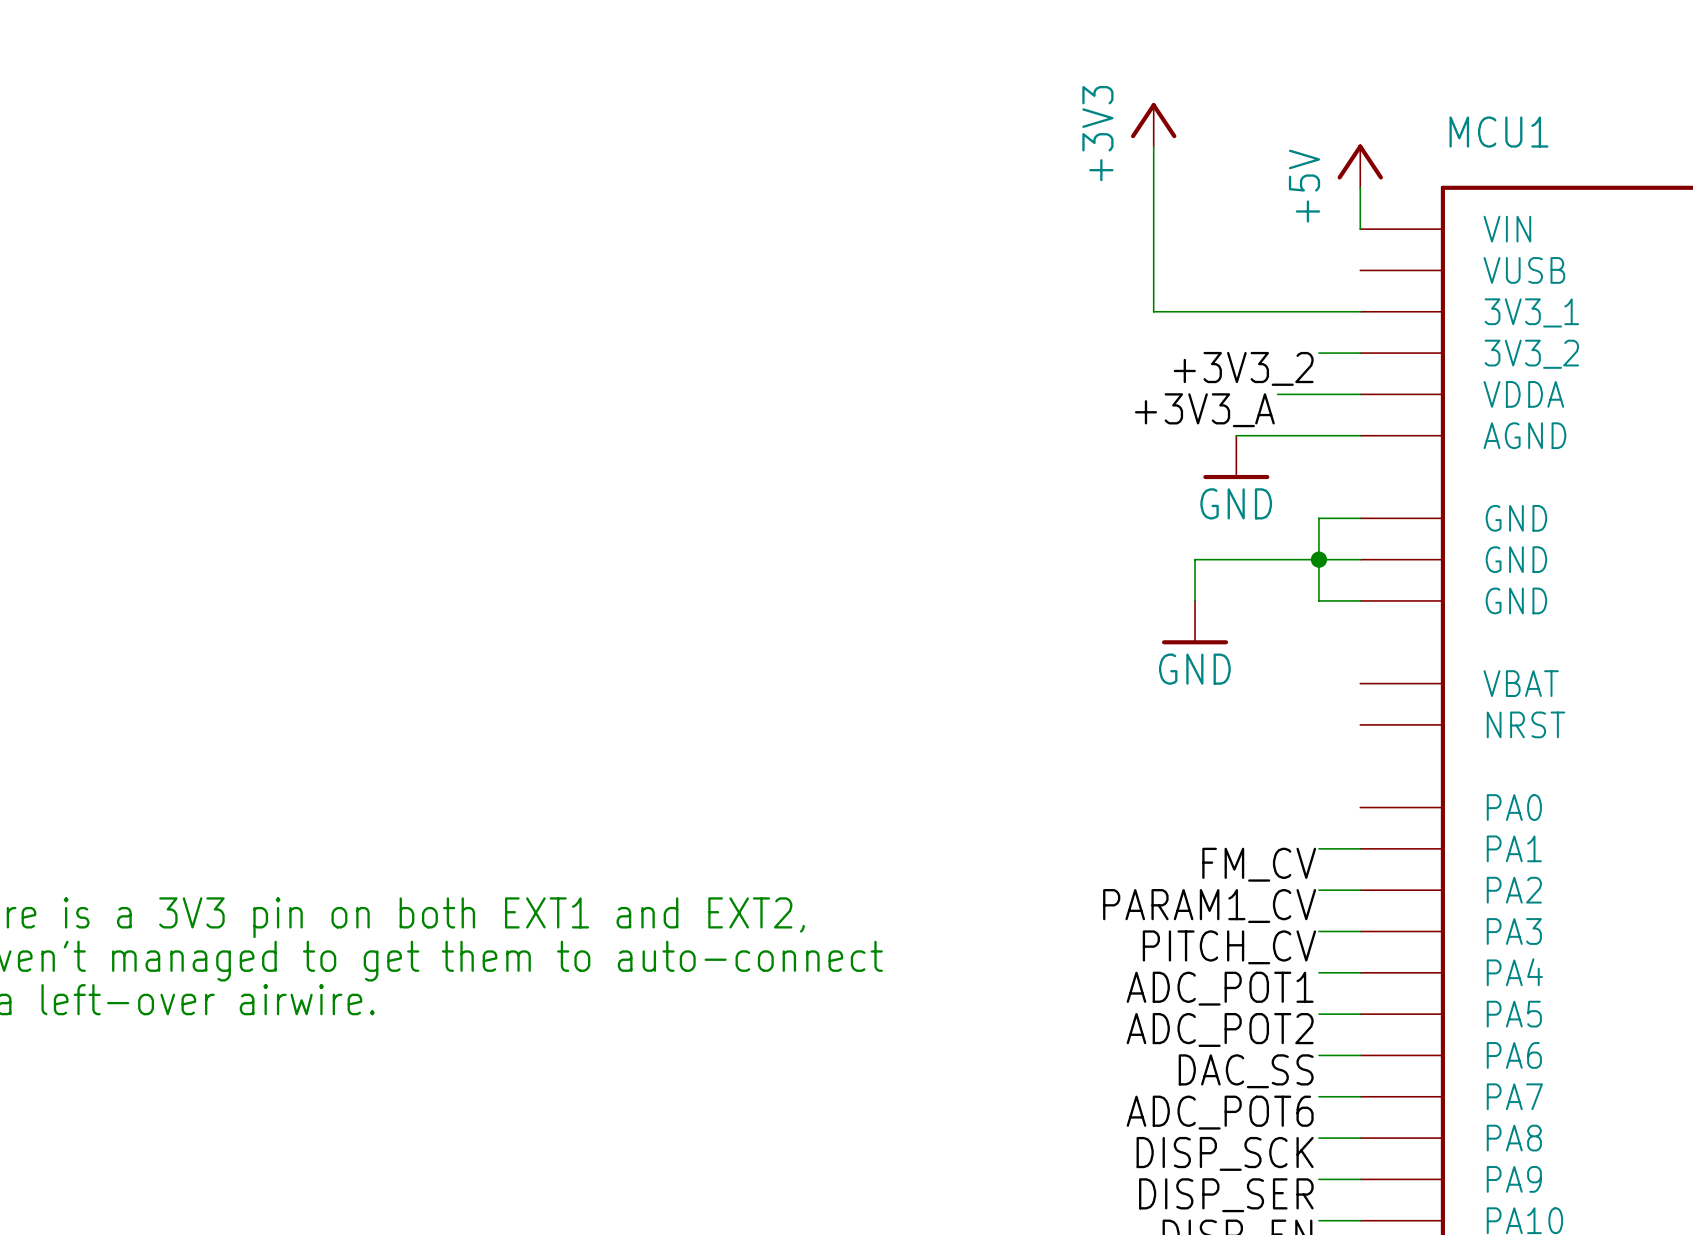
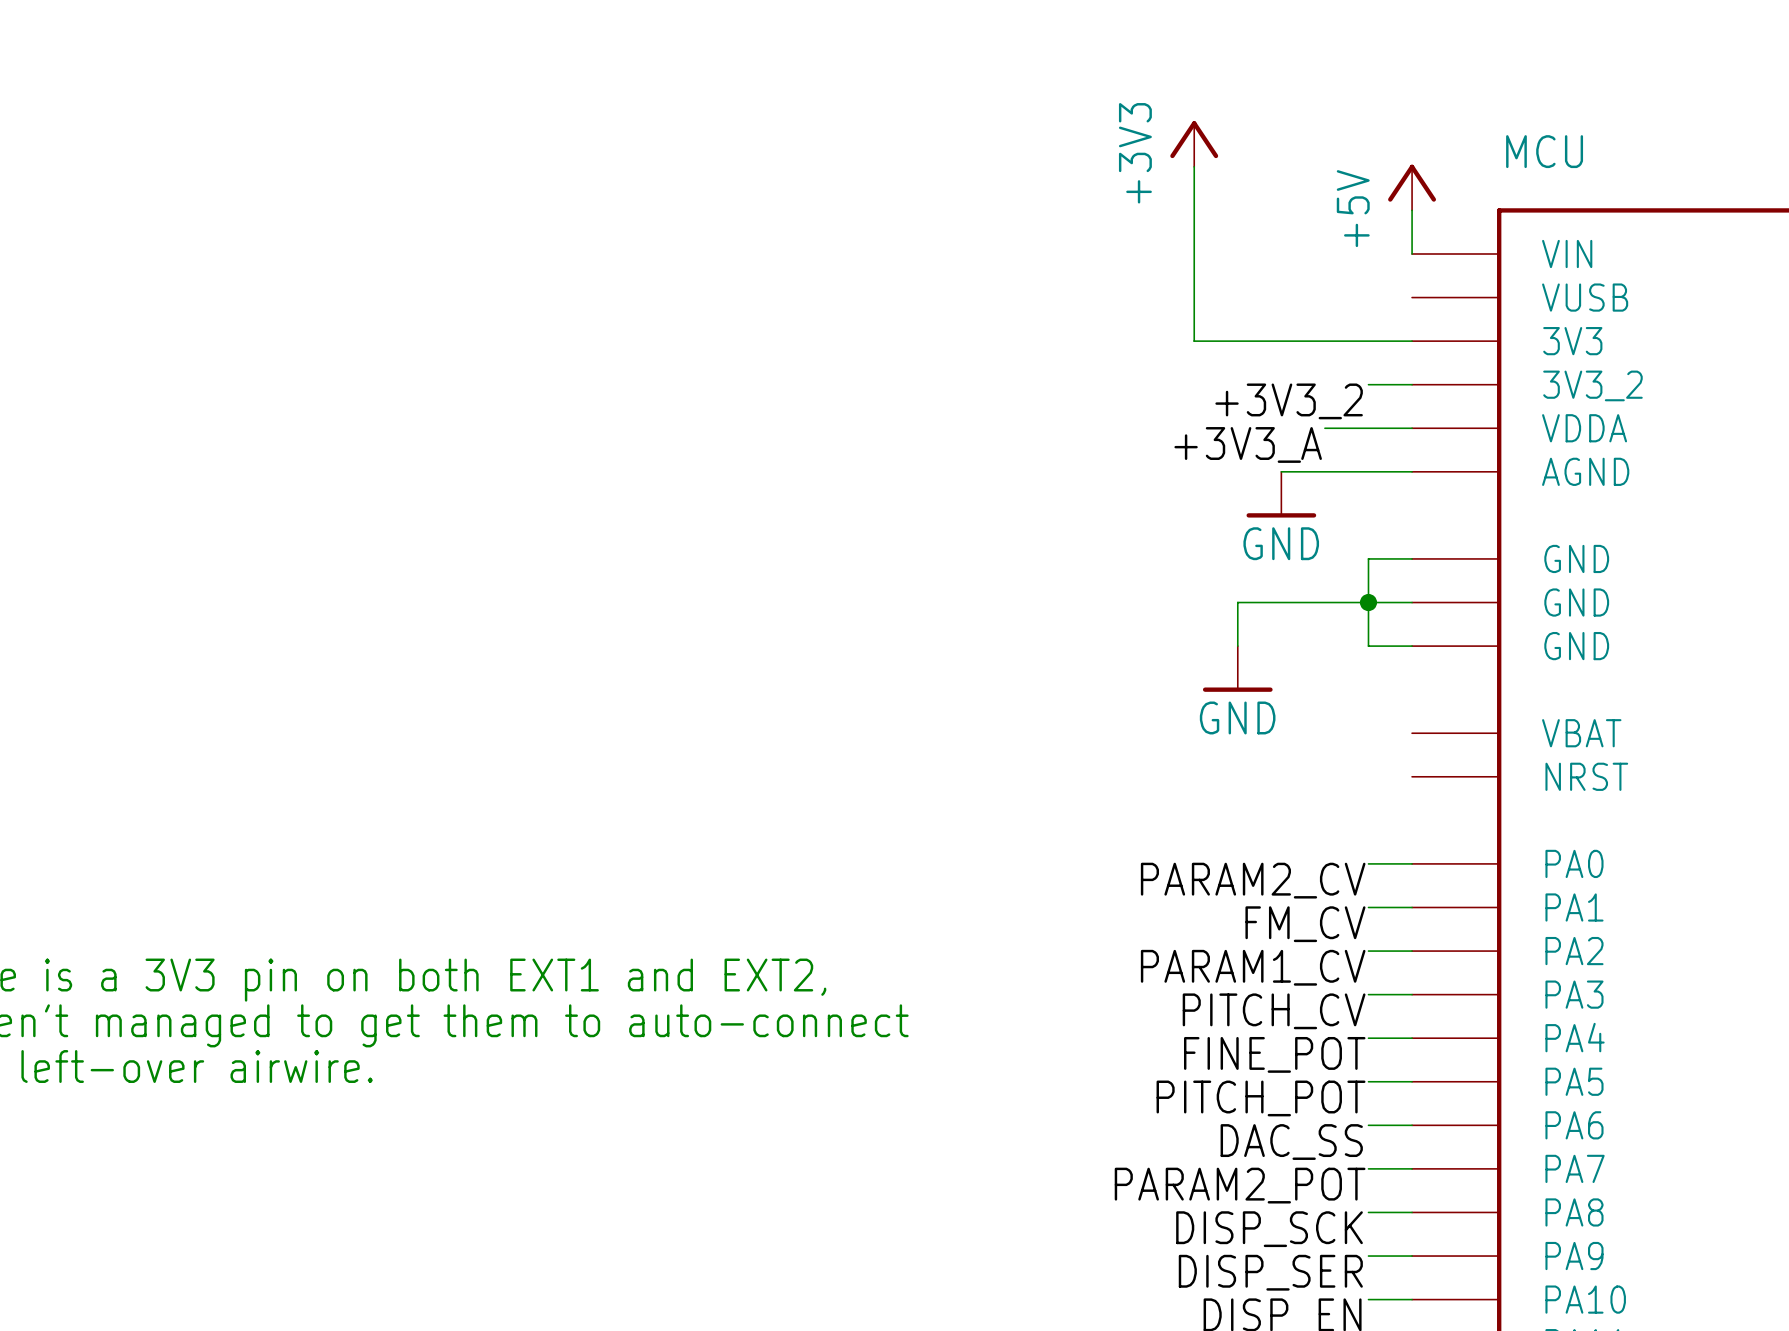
MCU1 name: MCU1 (1498, 132) -> MCU (1544, 151)
MCU1 pin name: 3V3_1 (1531, 312) -> 3V3 (1572, 341)
wire: none -> (1368, 863) (1412, 863)
label: none -> PARAM2_CV (1253, 880)
label: ADC_POT1 (1220, 988) -> FINE_POT (1274, 1054)
label: ADC_POT2 (1220, 1029) -> PITCH_POT (1261, 1098)
label: ADC_POT6 (1220, 1112) -> PARAM2_POT (1240, 1185)

